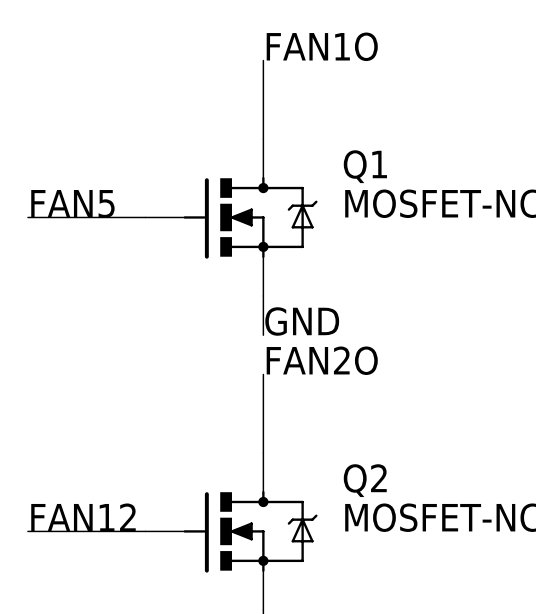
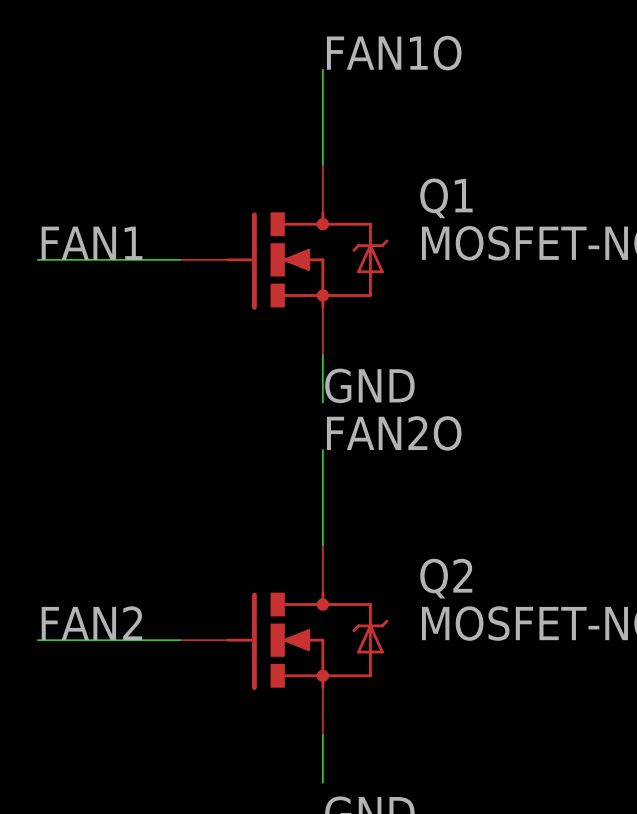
label: FAN5 (72, 204) -> FAN1 (92, 243)
label: FAN12 (83, 517) -> FAN2 (91, 623)

